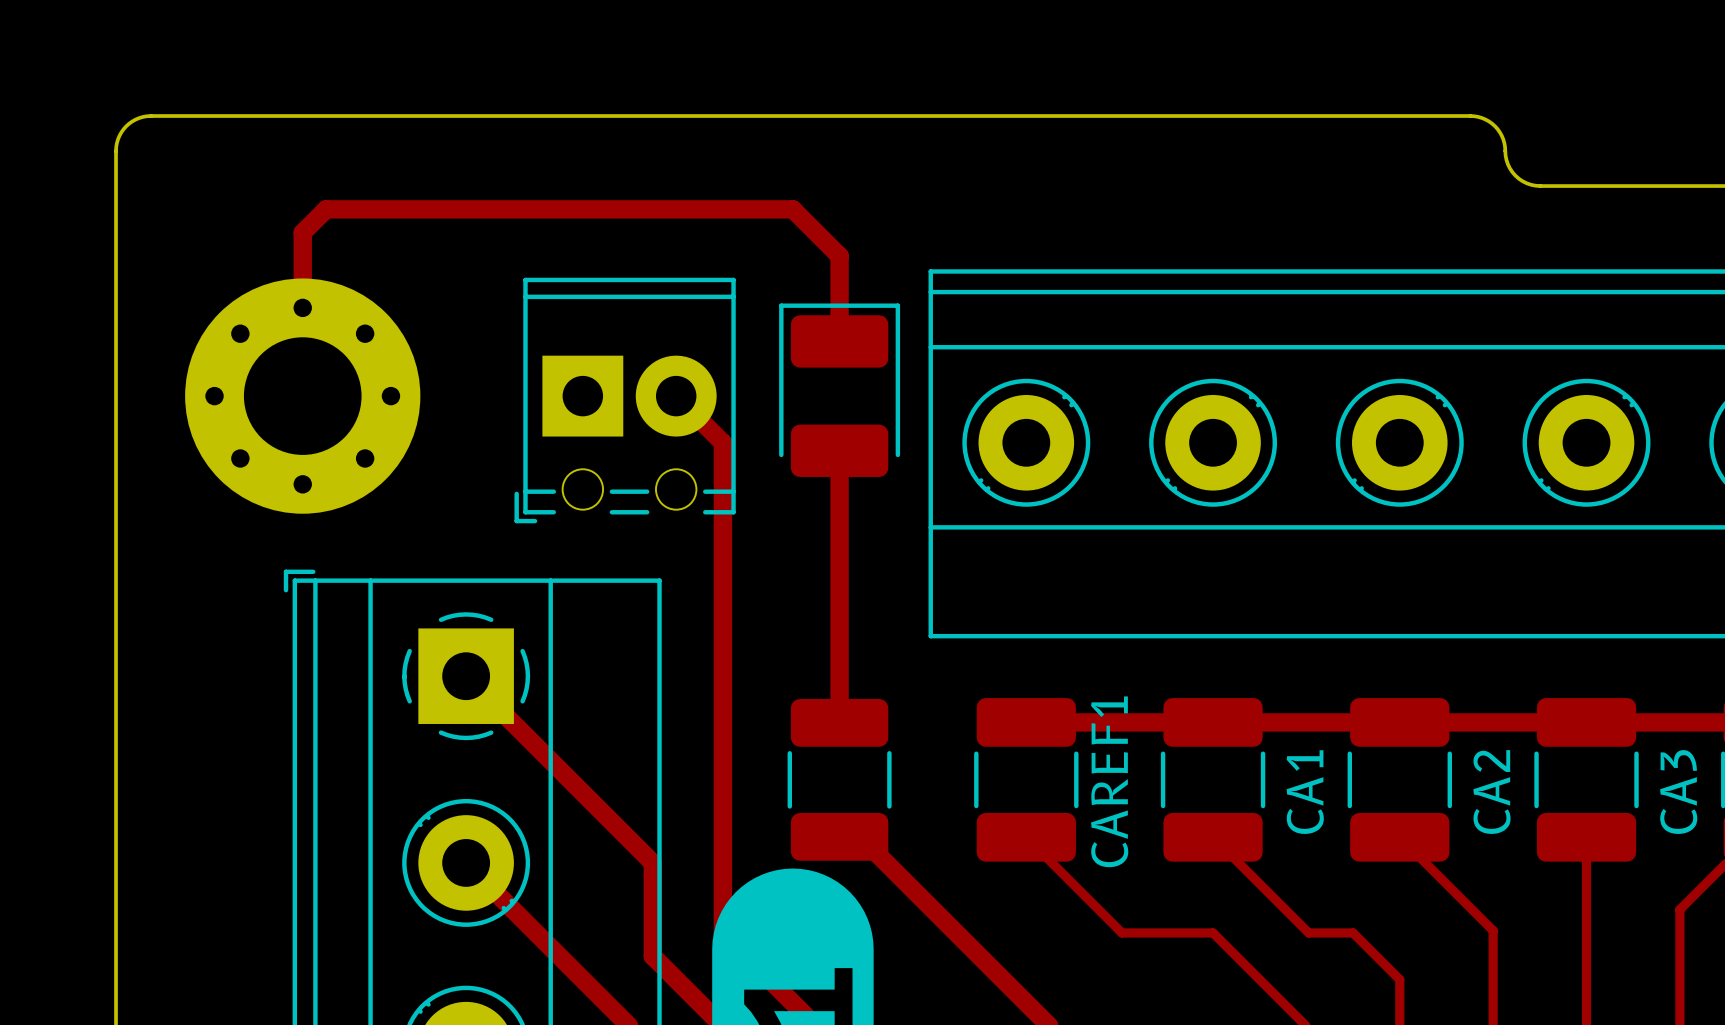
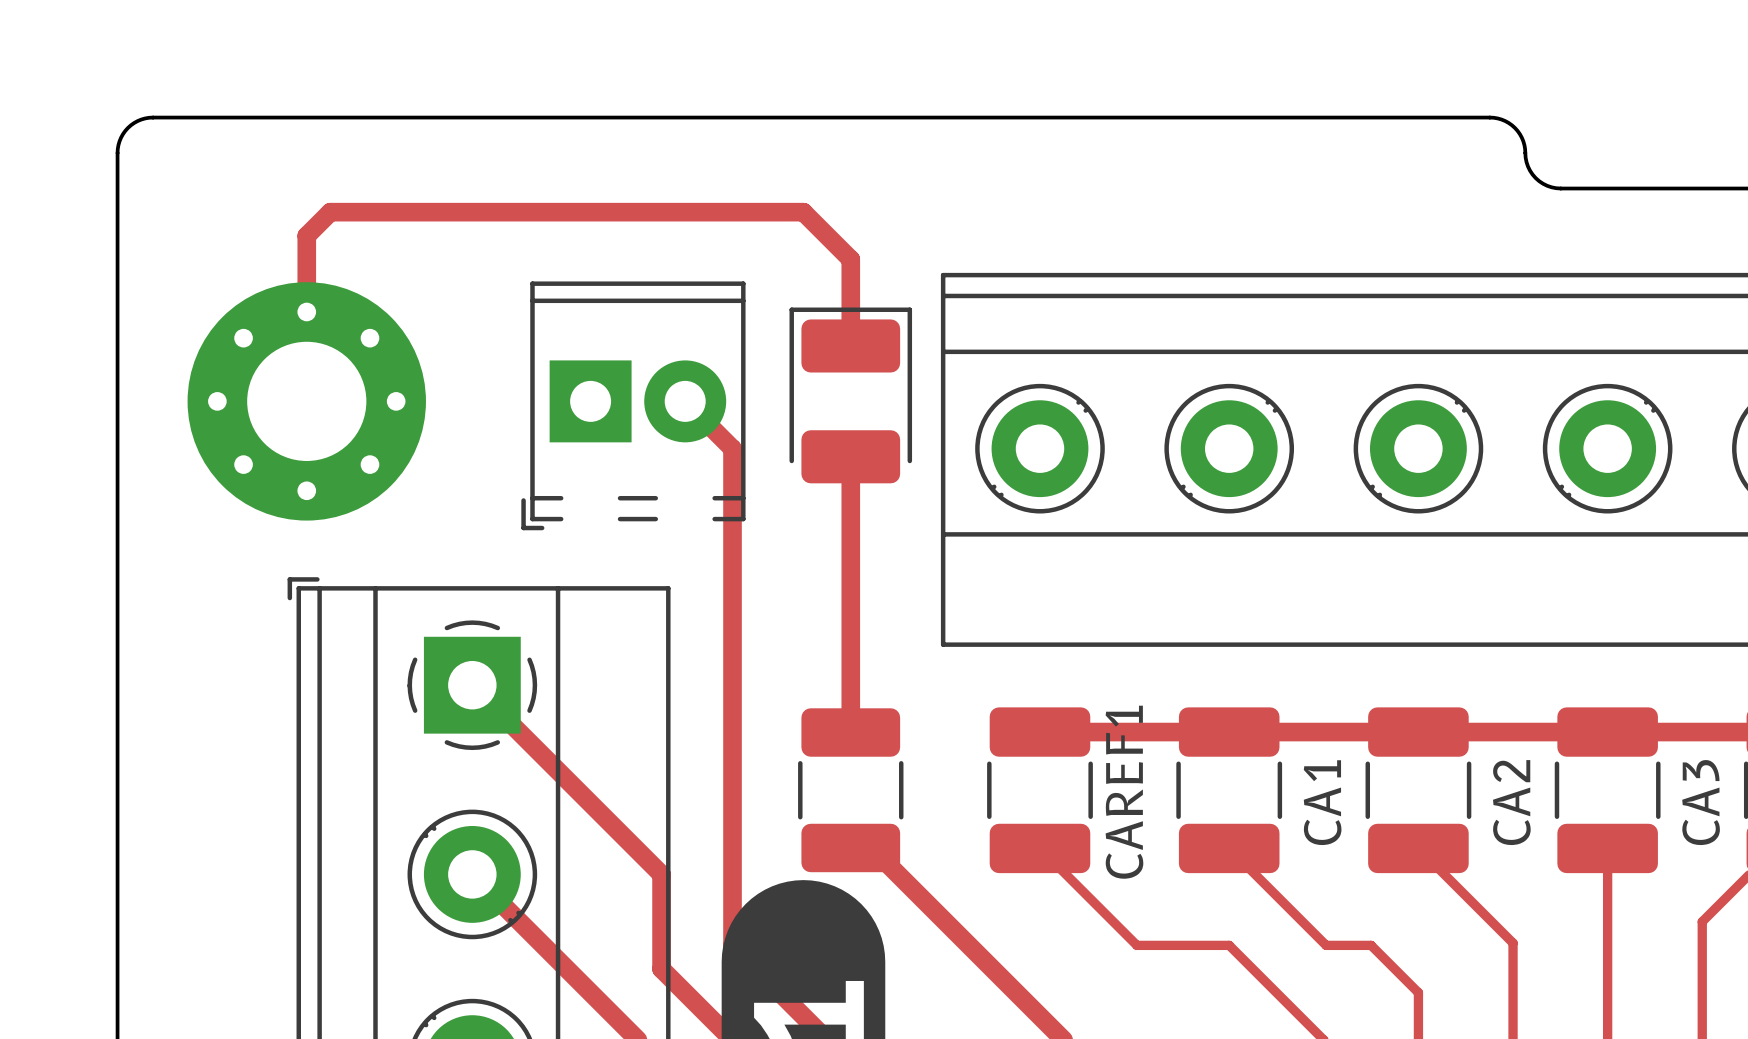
part footprint: [514, 277, 736, 524] -> [521, 281, 746, 531]

